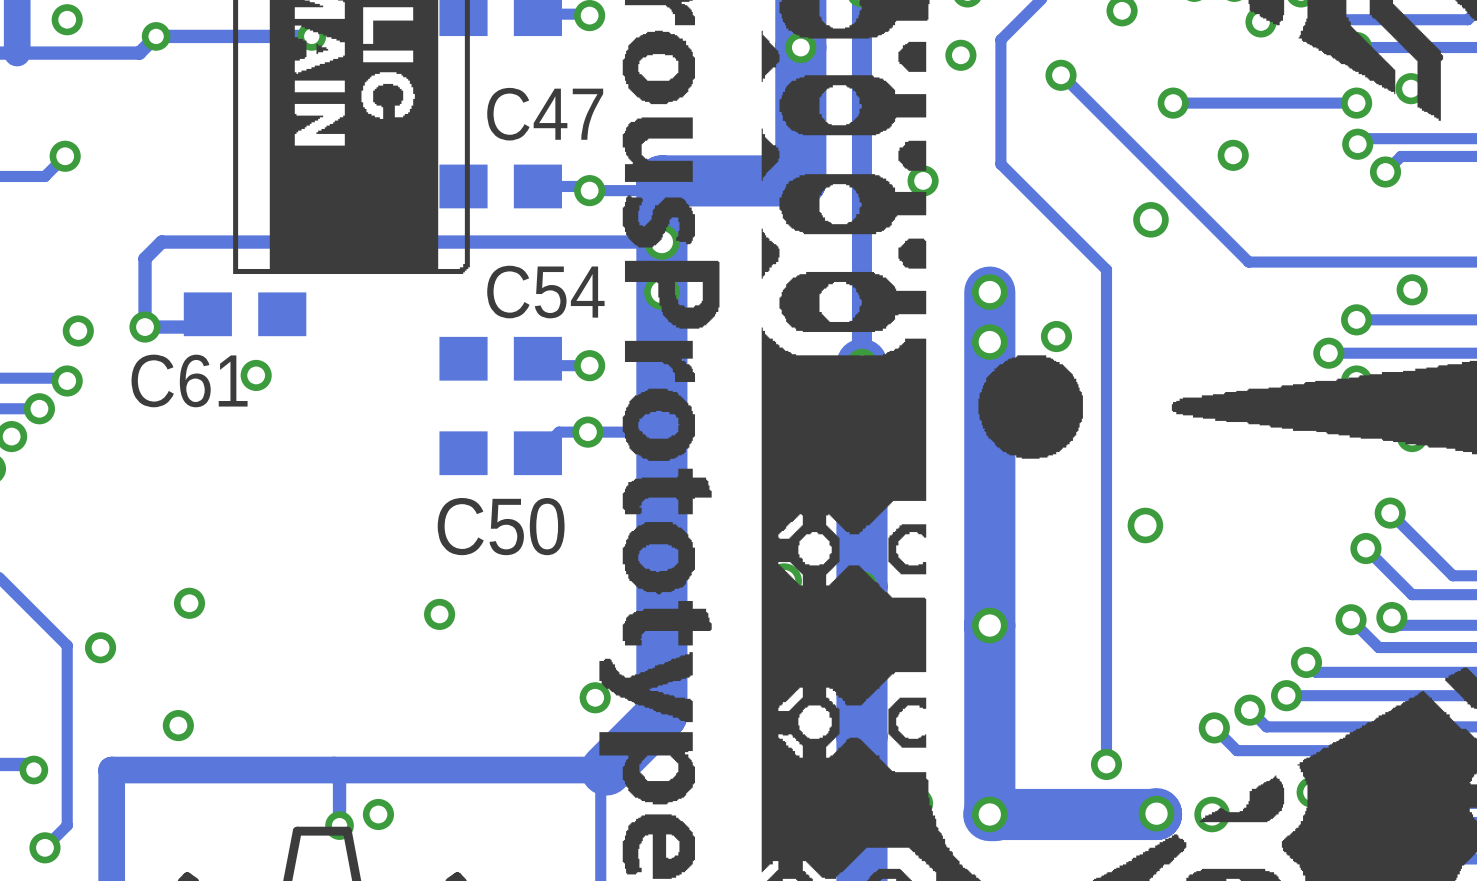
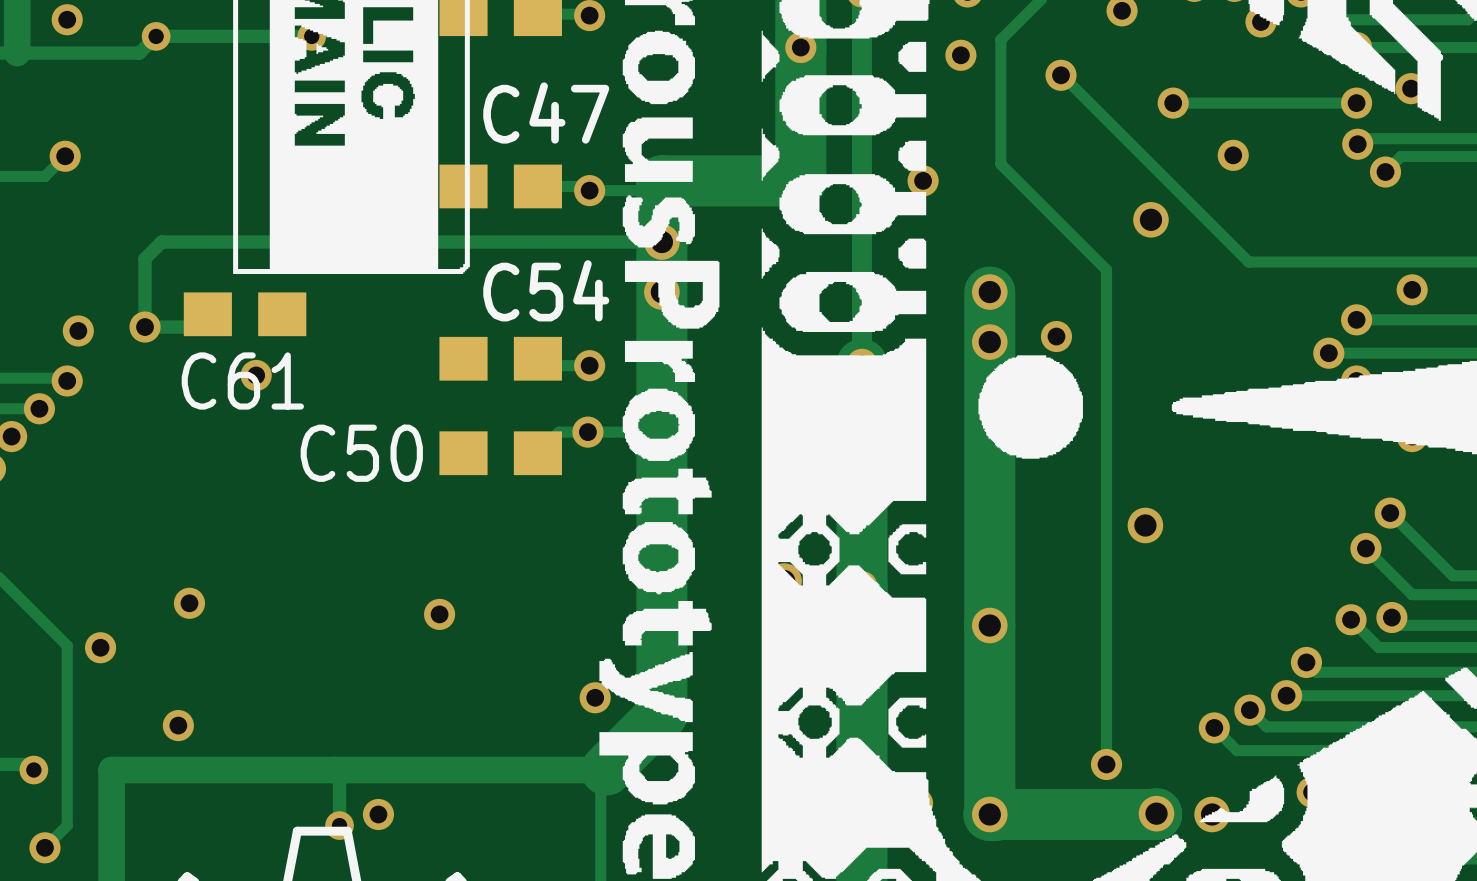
C61 name position: C61 (189, 380) -> C61 (242, 380)
C50 name position: C50 (501, 526) -> C50 (361, 453)

